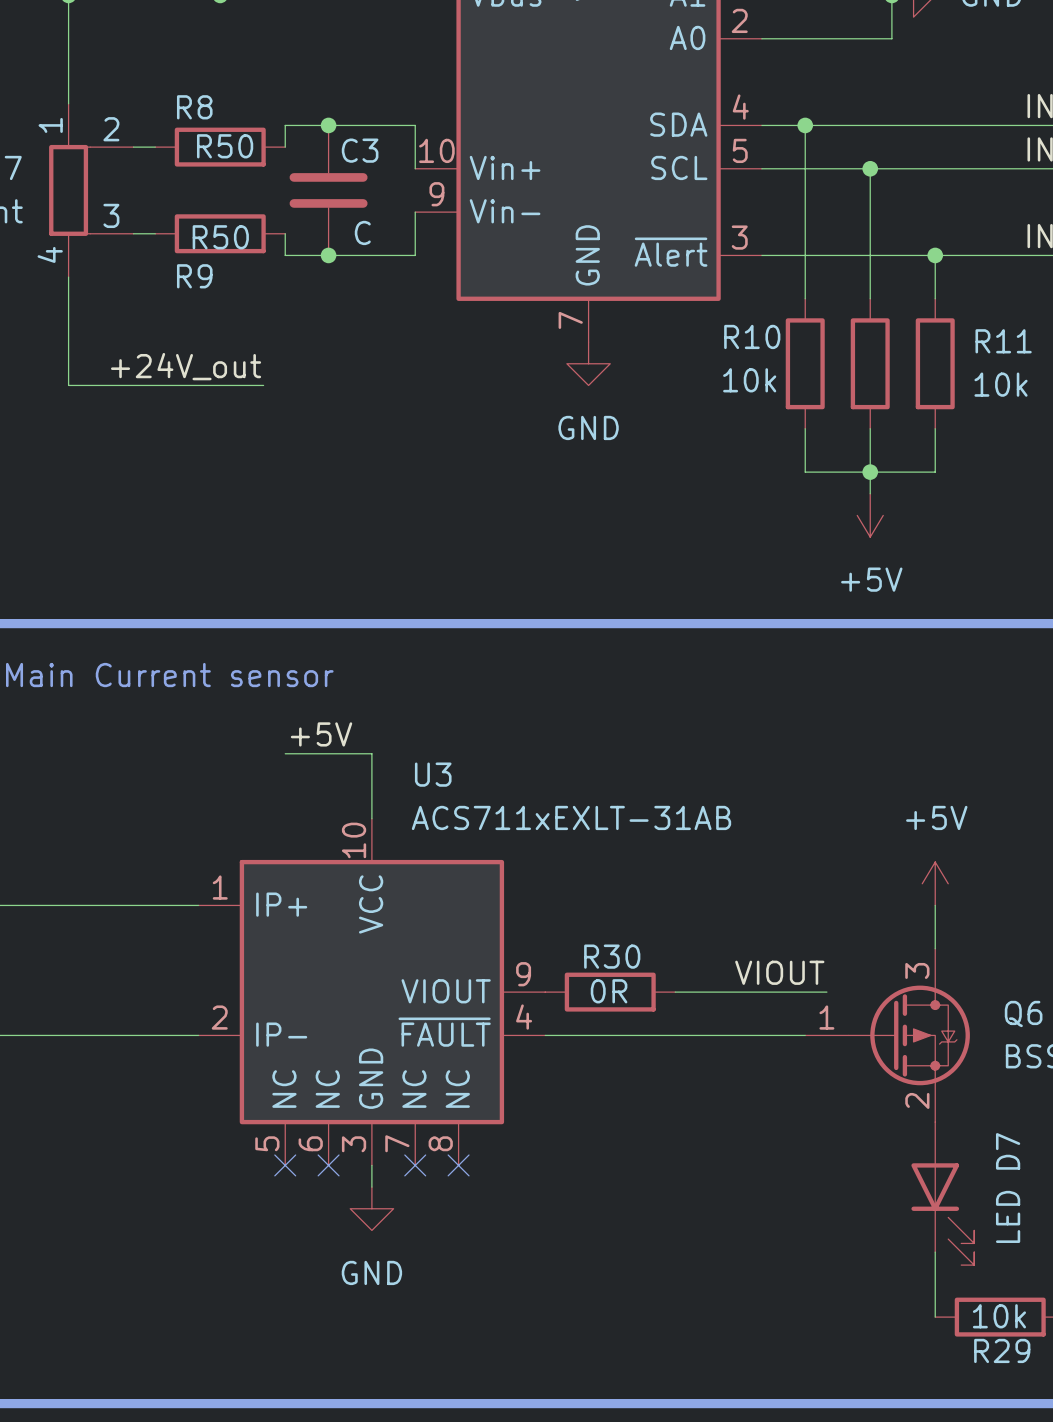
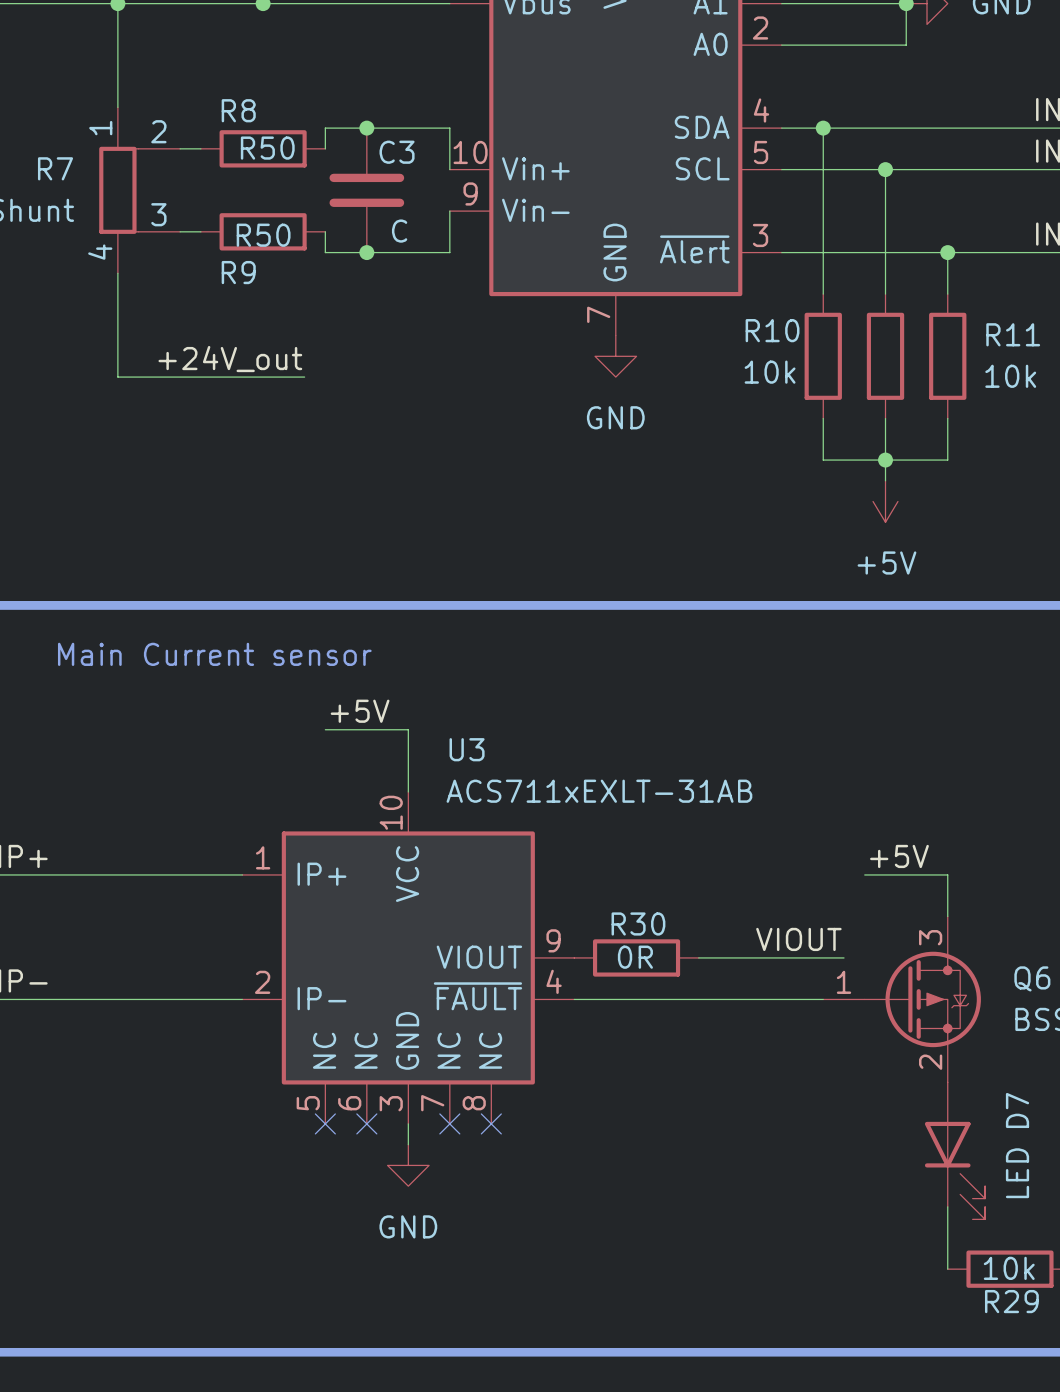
power symbol: +5V (935, 883) -> none
label: none -> +5V (899, 856)
wire: none -> (864, 874) (947, 874)

